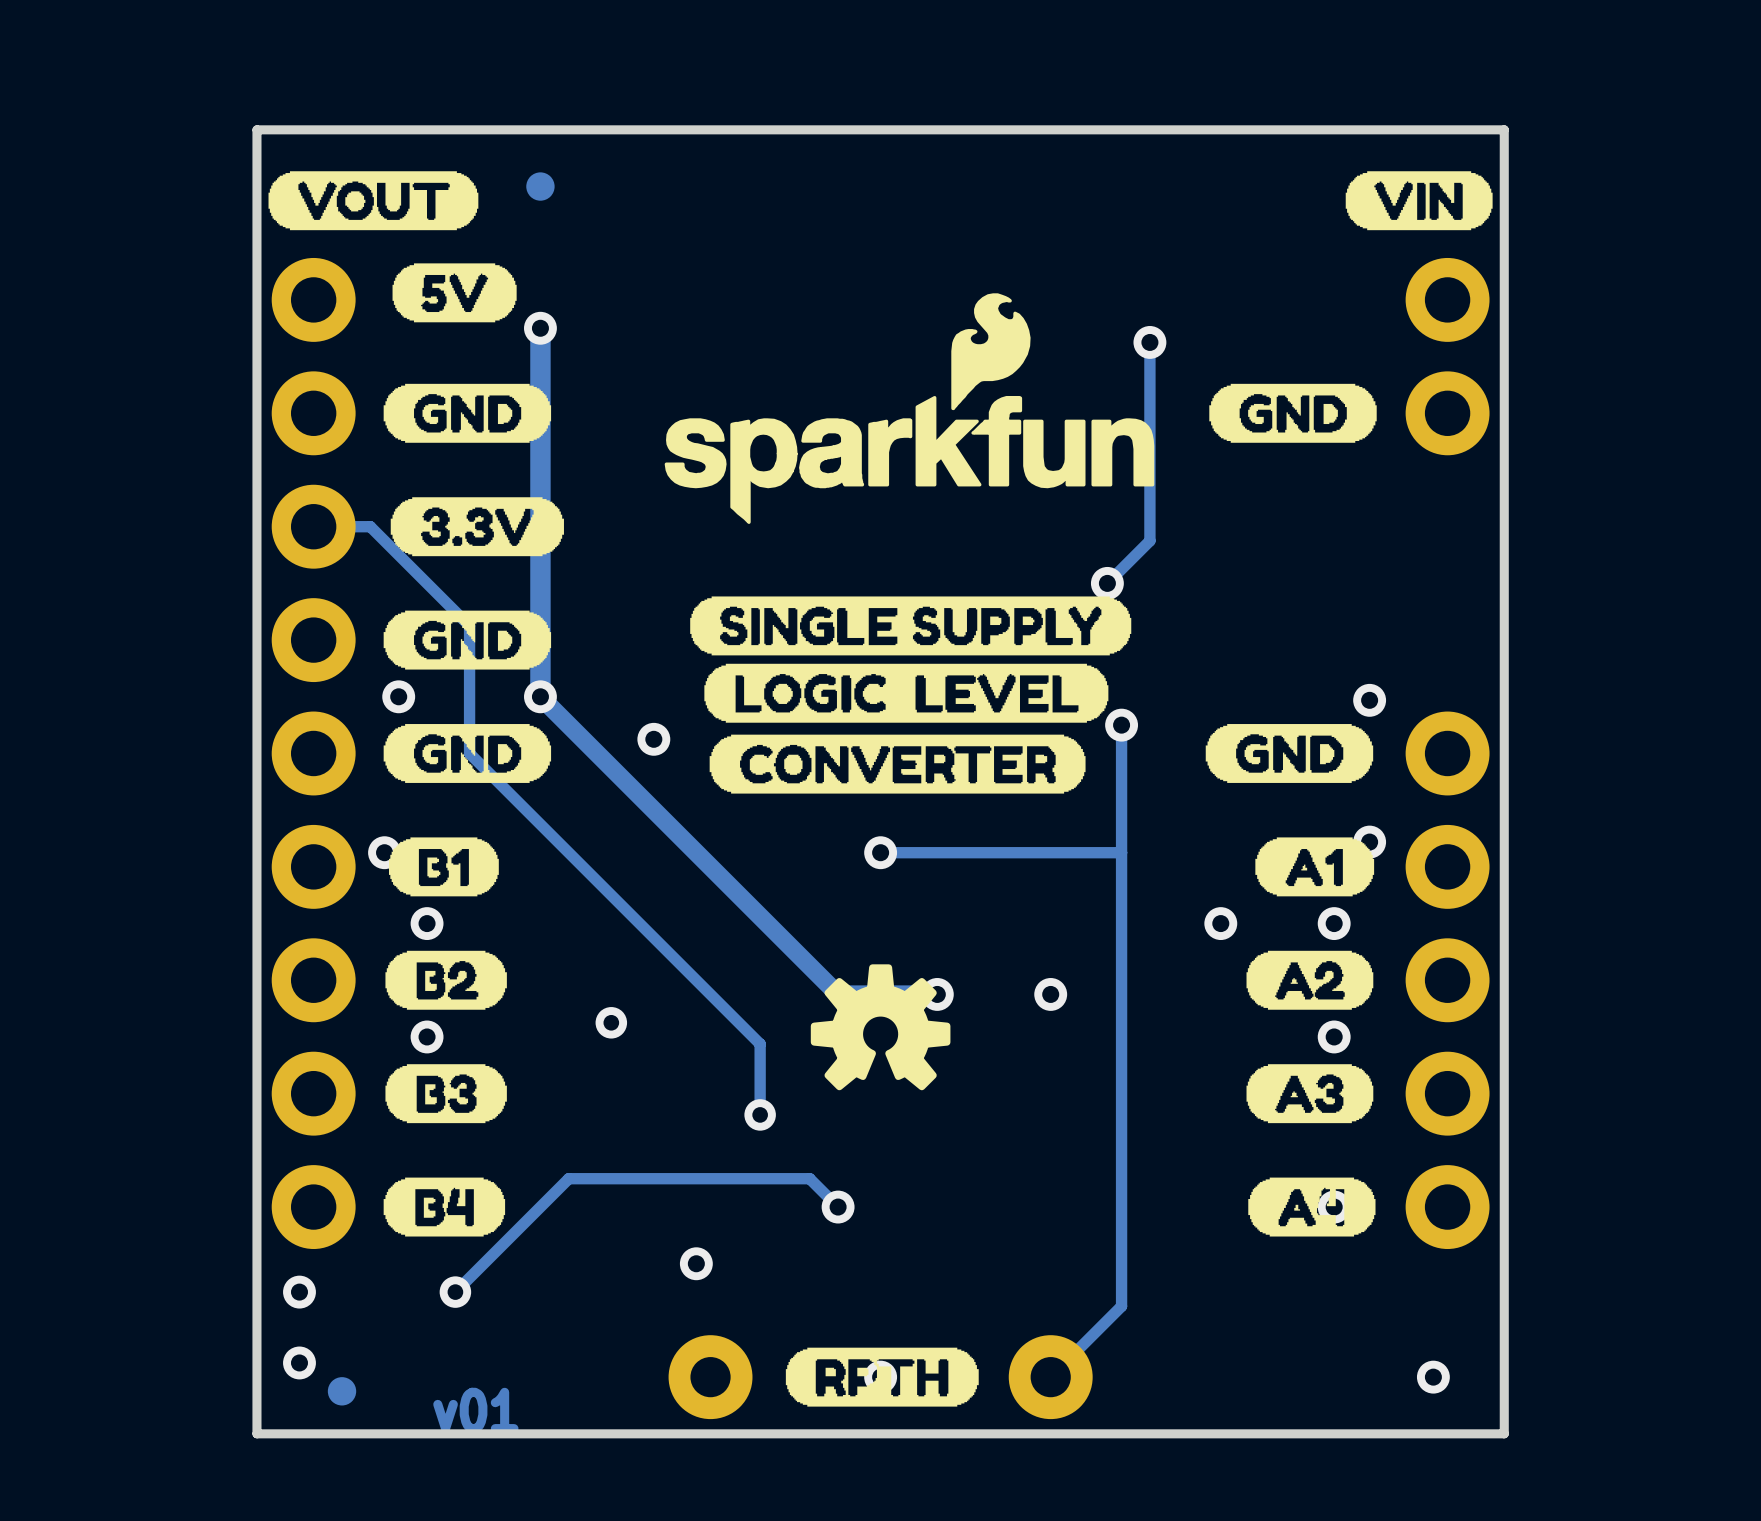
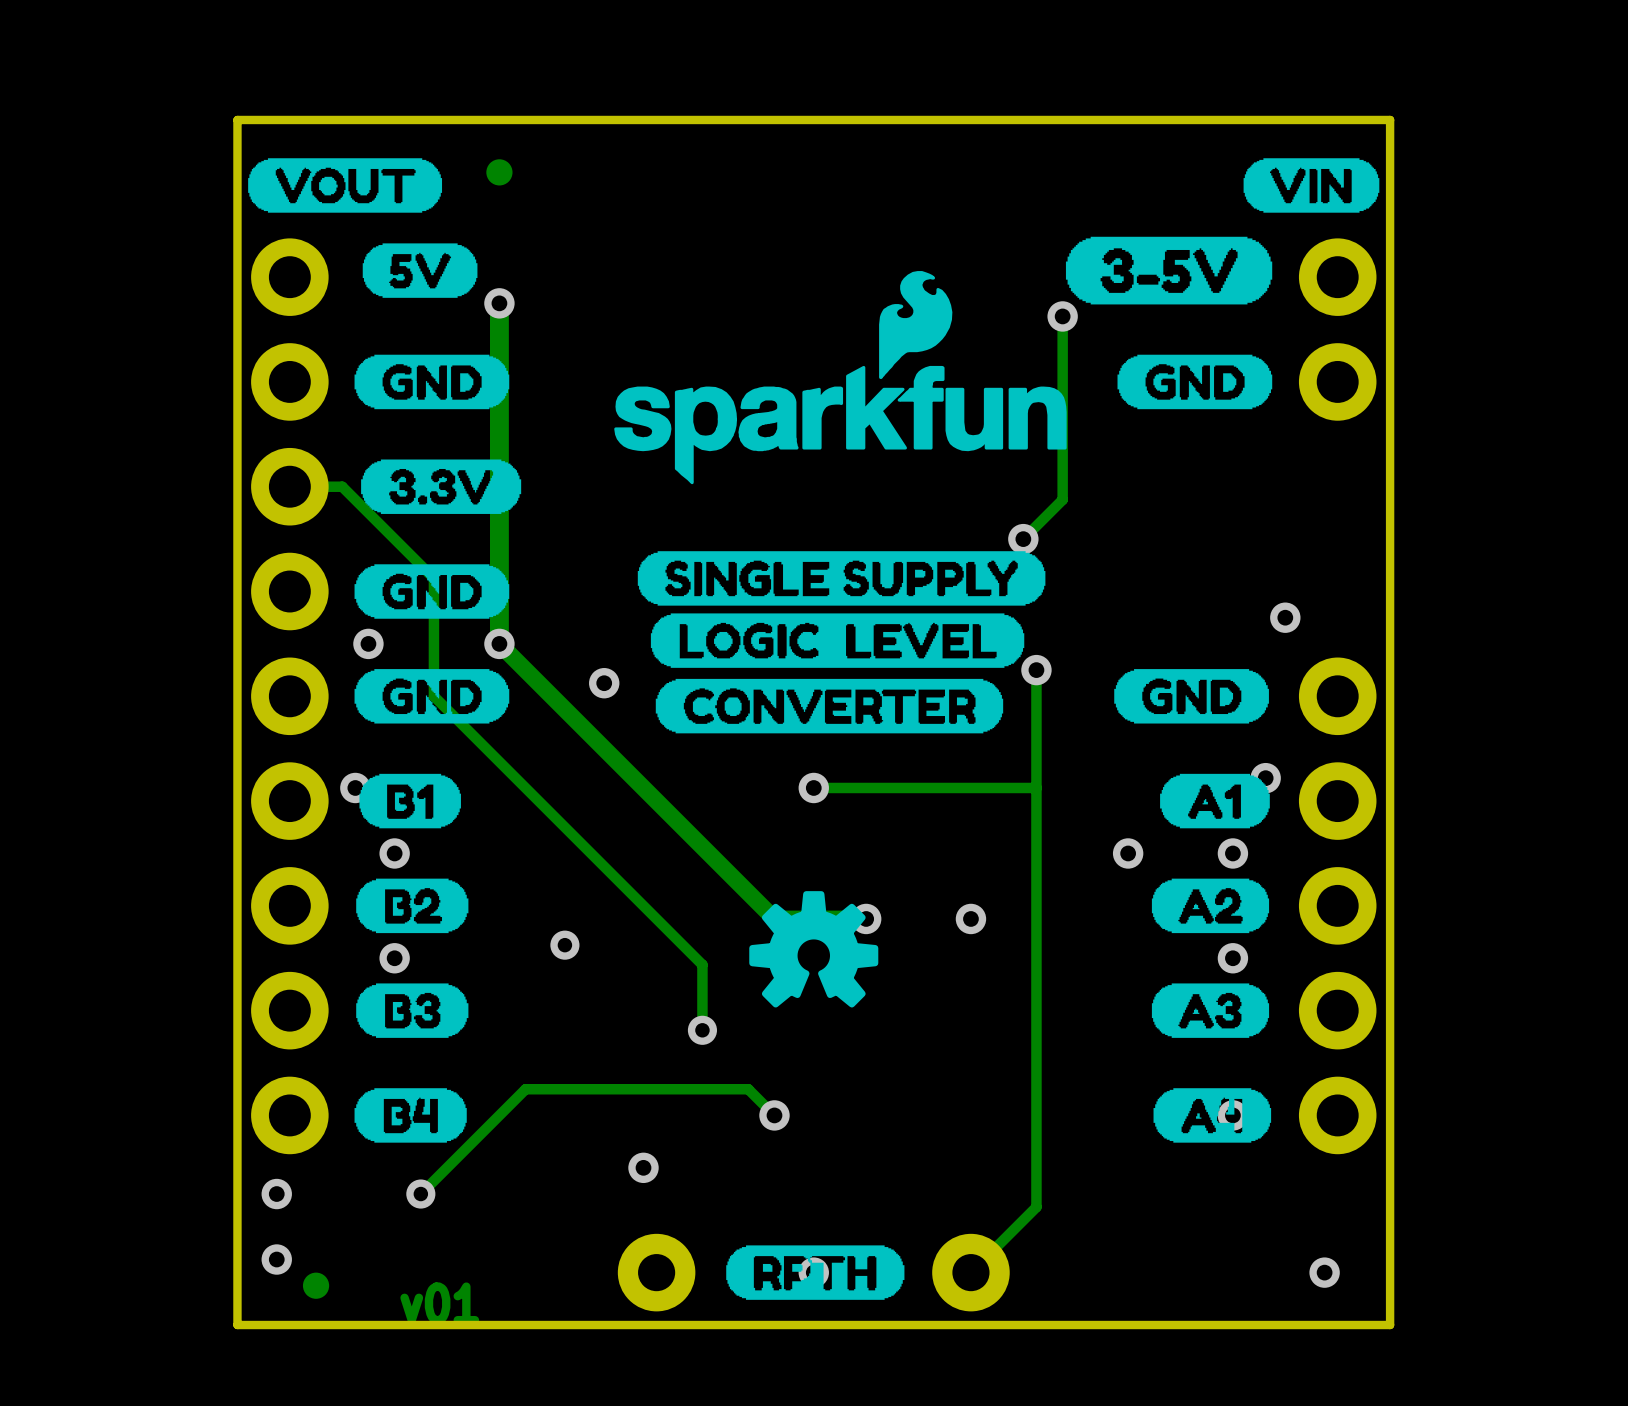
drawing: none -> [1065, 236, 1273, 305]
via position: (1369, 700) -> (1285, 617)

